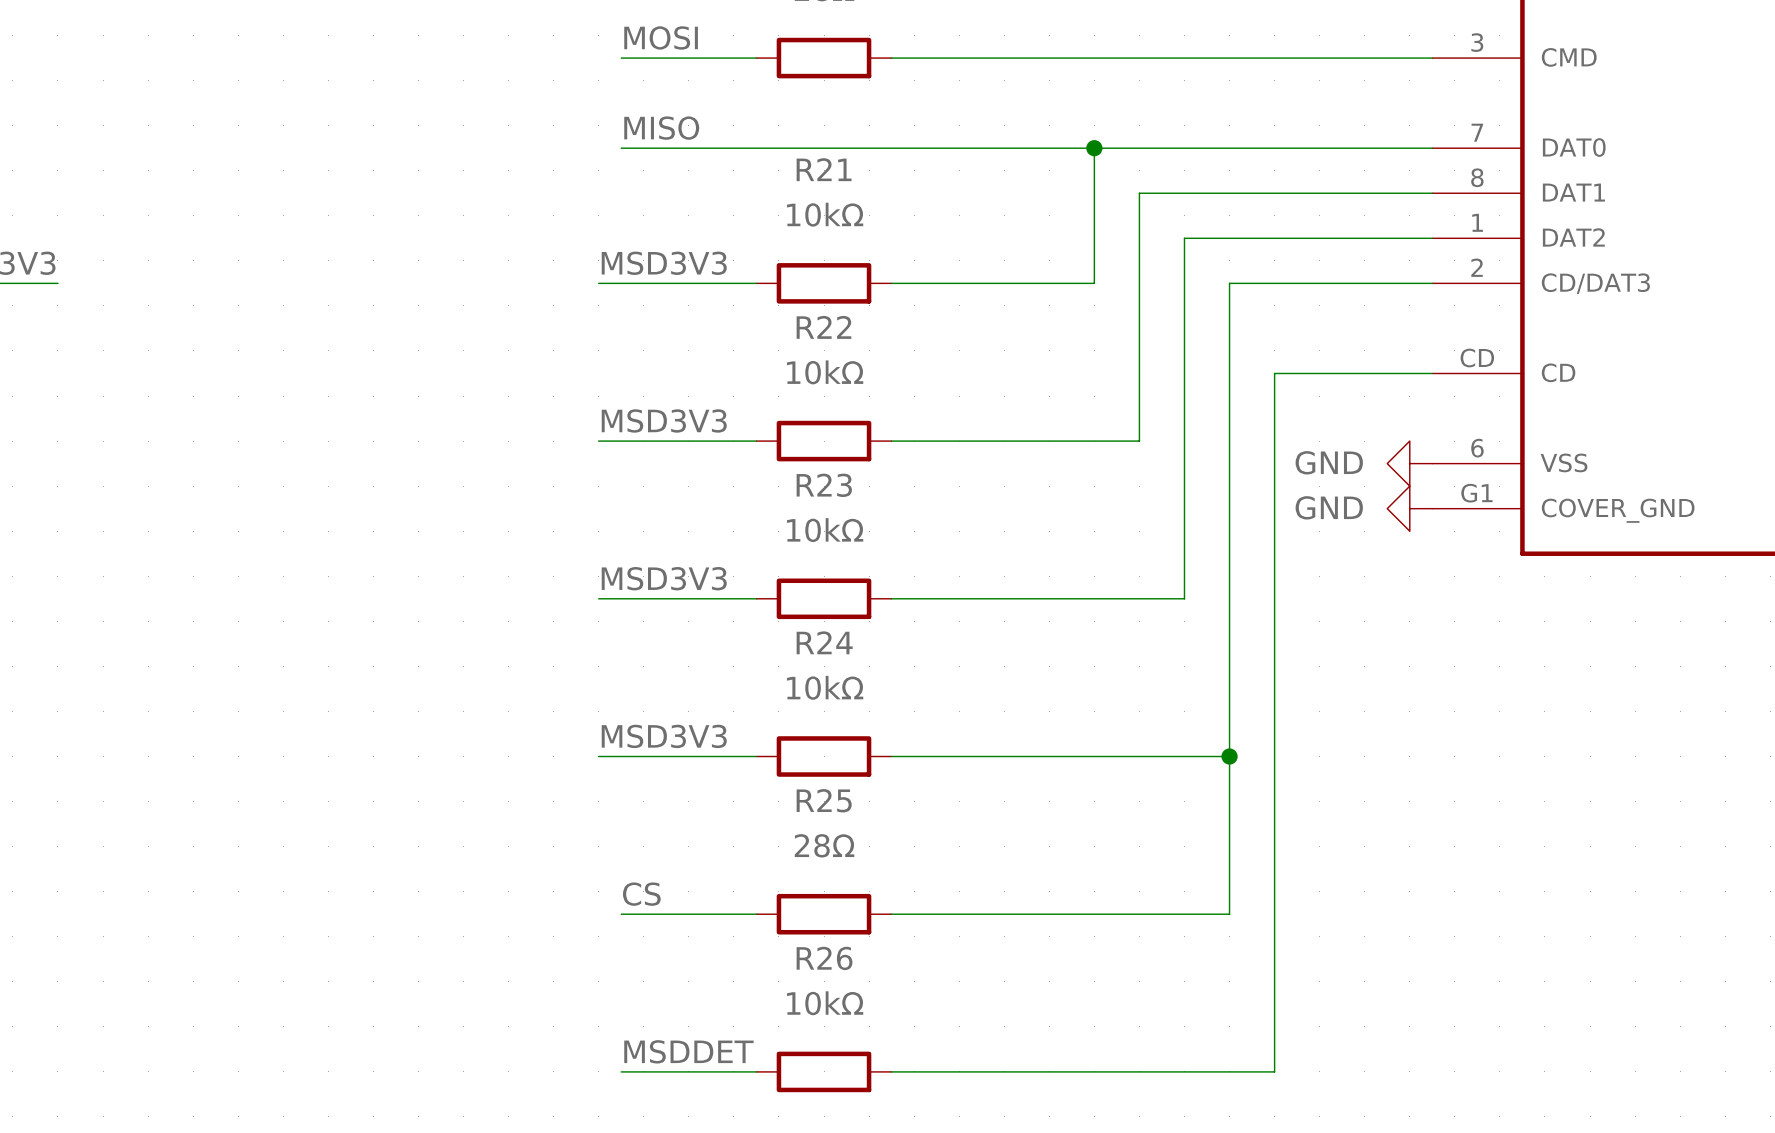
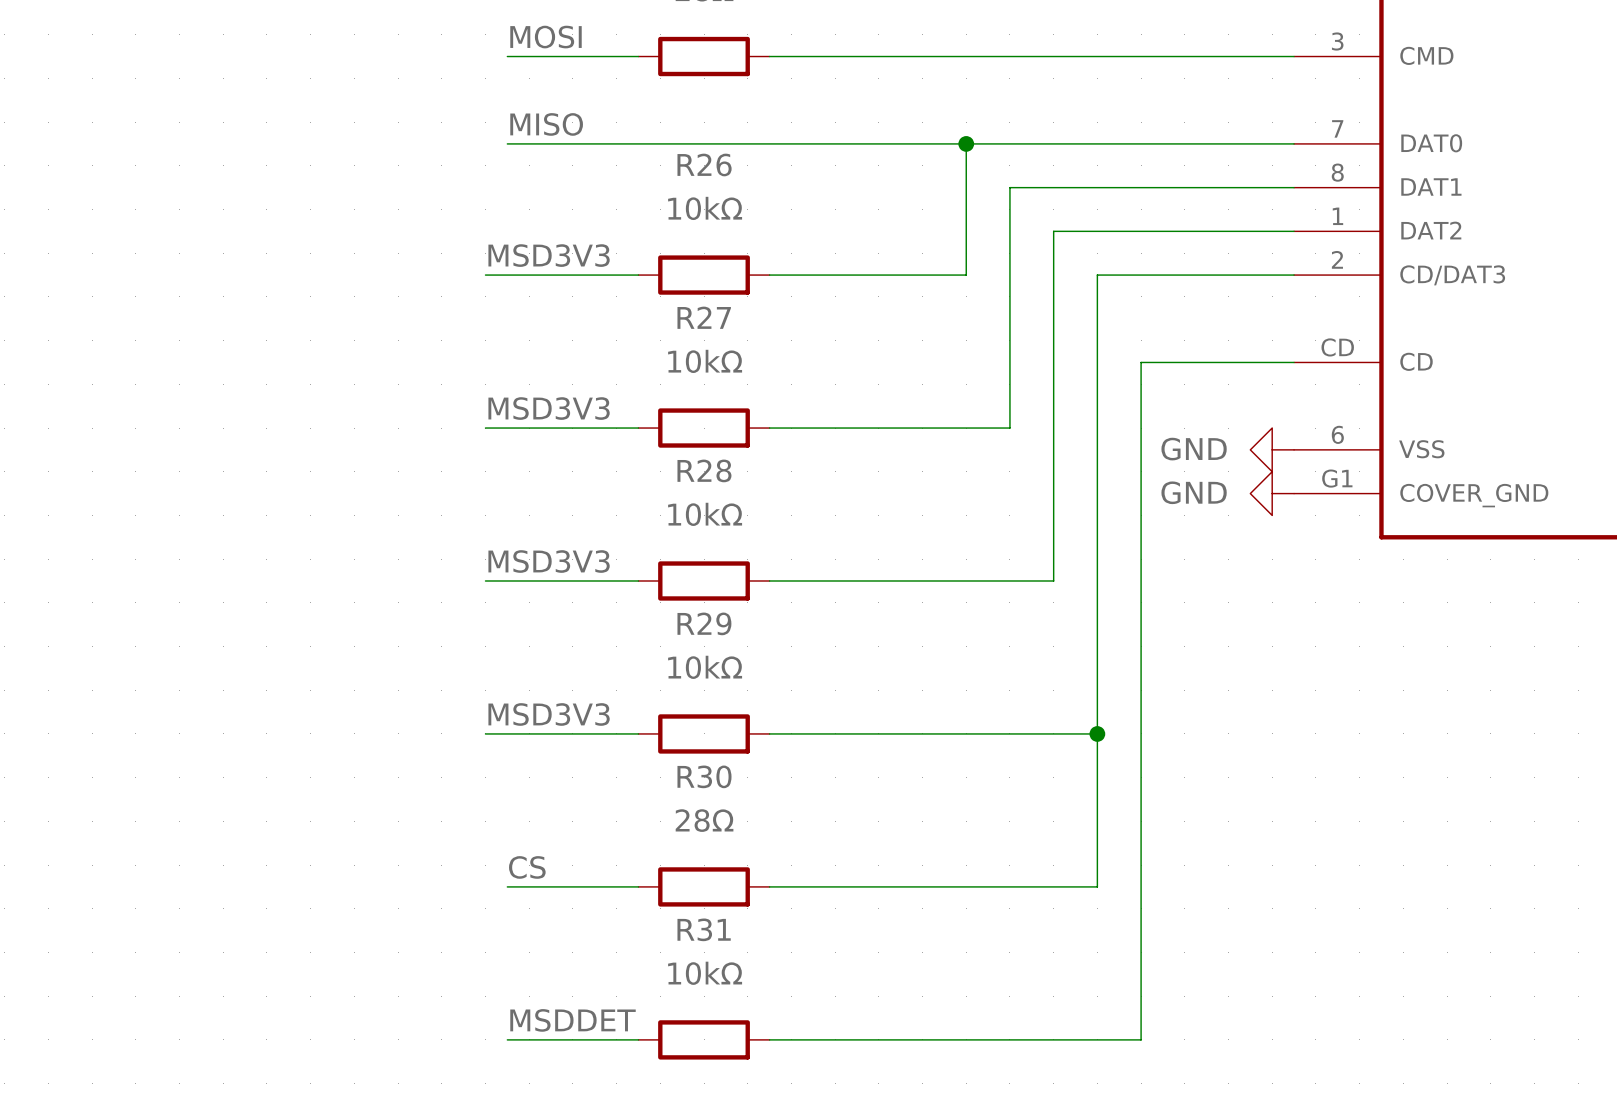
R21 name: R21 (824, 169) -> R26 (704, 164)
R22 name: R22 (823, 327) -> R27 (704, 317)
R23 name: R23 (824, 485) -> R28 (704, 470)
R24 name: R24 (824, 642) -> R29 (704, 623)
R25 name: R25 (824, 800) -> R30 (704, 776)
R26 name: R26 (824, 958) -> R31 (704, 929)

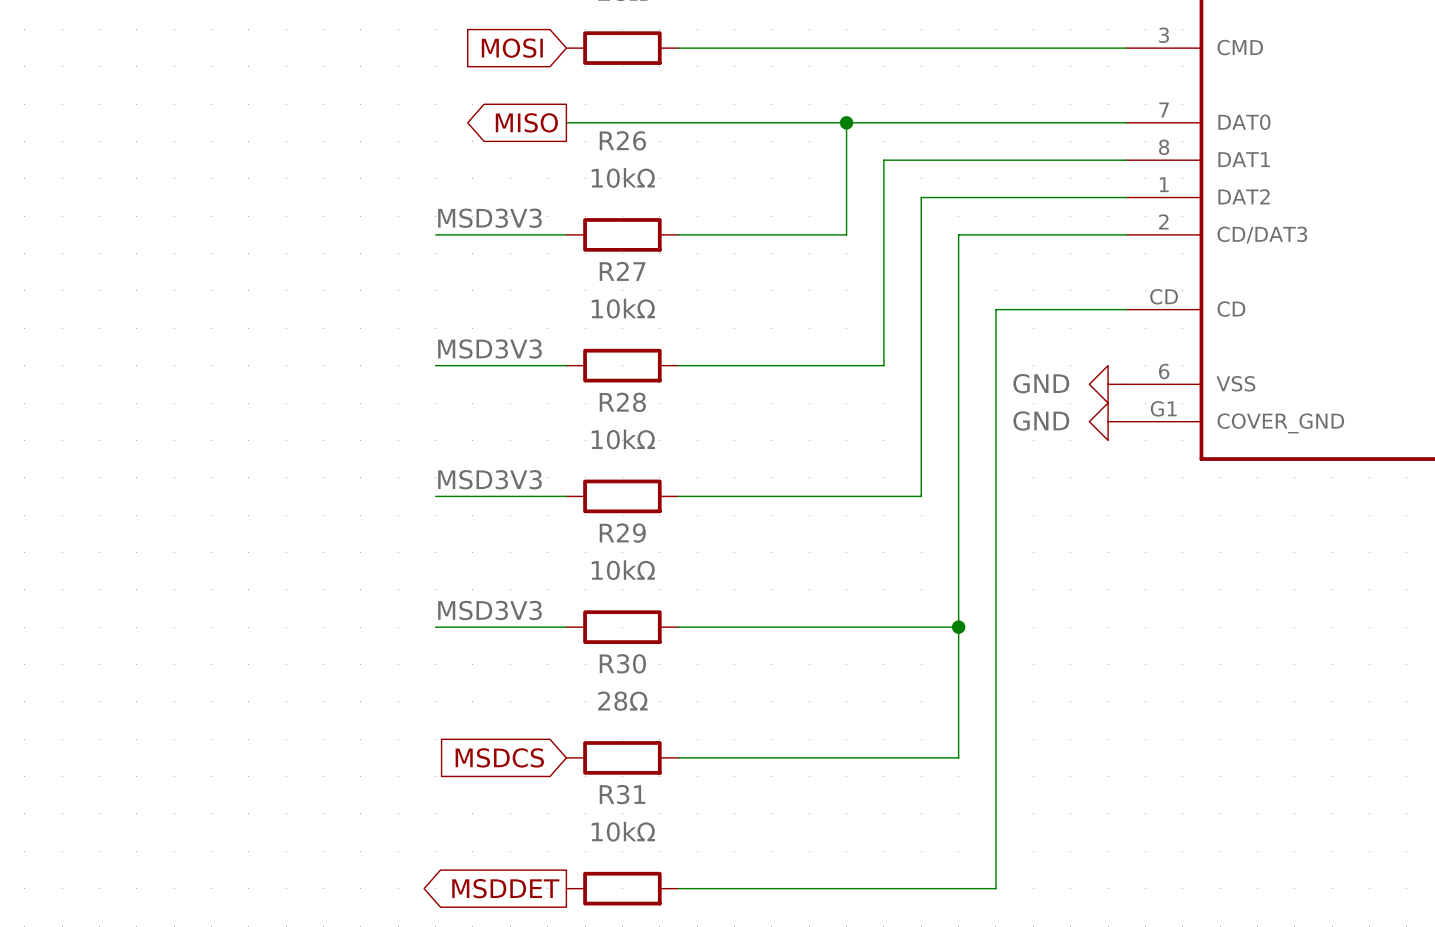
label: MOSI (546, 37) -> none
wire: (507, 56) (638, 56) -> none
global label: none -> MOSI (512, 48)
label: MISO (546, 124) -> none
wire: (507, 143) (638, 143) -> none
global label: none -> MISO (526, 122)
label: CS (527, 867) -> none
wire: (507, 886) (638, 886) -> none
global label: none -> MSDCS (499, 757)
label: MSDDET (573, 1020) -> none
wire: (507, 1039) (638, 1039) -> none
global label: none -> MSDDET (505, 888)

